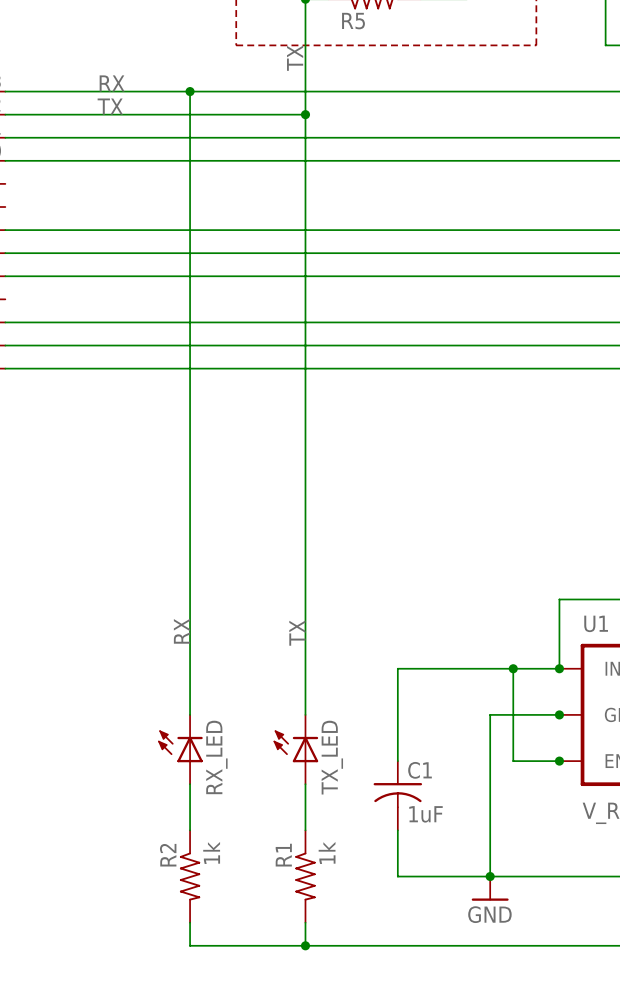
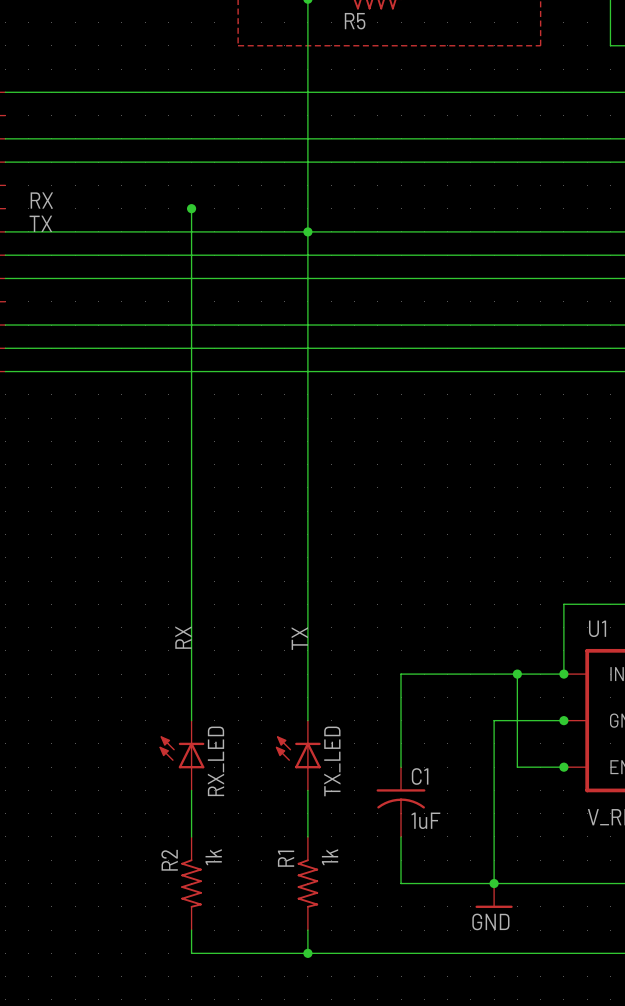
label: TX (295, 58) -> none
label position: RX (112, 83) -> RX (41, 200)
wire: (190, 91) (190, 207) -> none
junction: (190, 91) -> none
label position: TX (110, 106) -> TX (40, 223)
wire: (5, 114) (305, 114) -> none
junction: (305, 114) -> none
junction: none -> (191, 208)
junction: none -> (307, 231)

